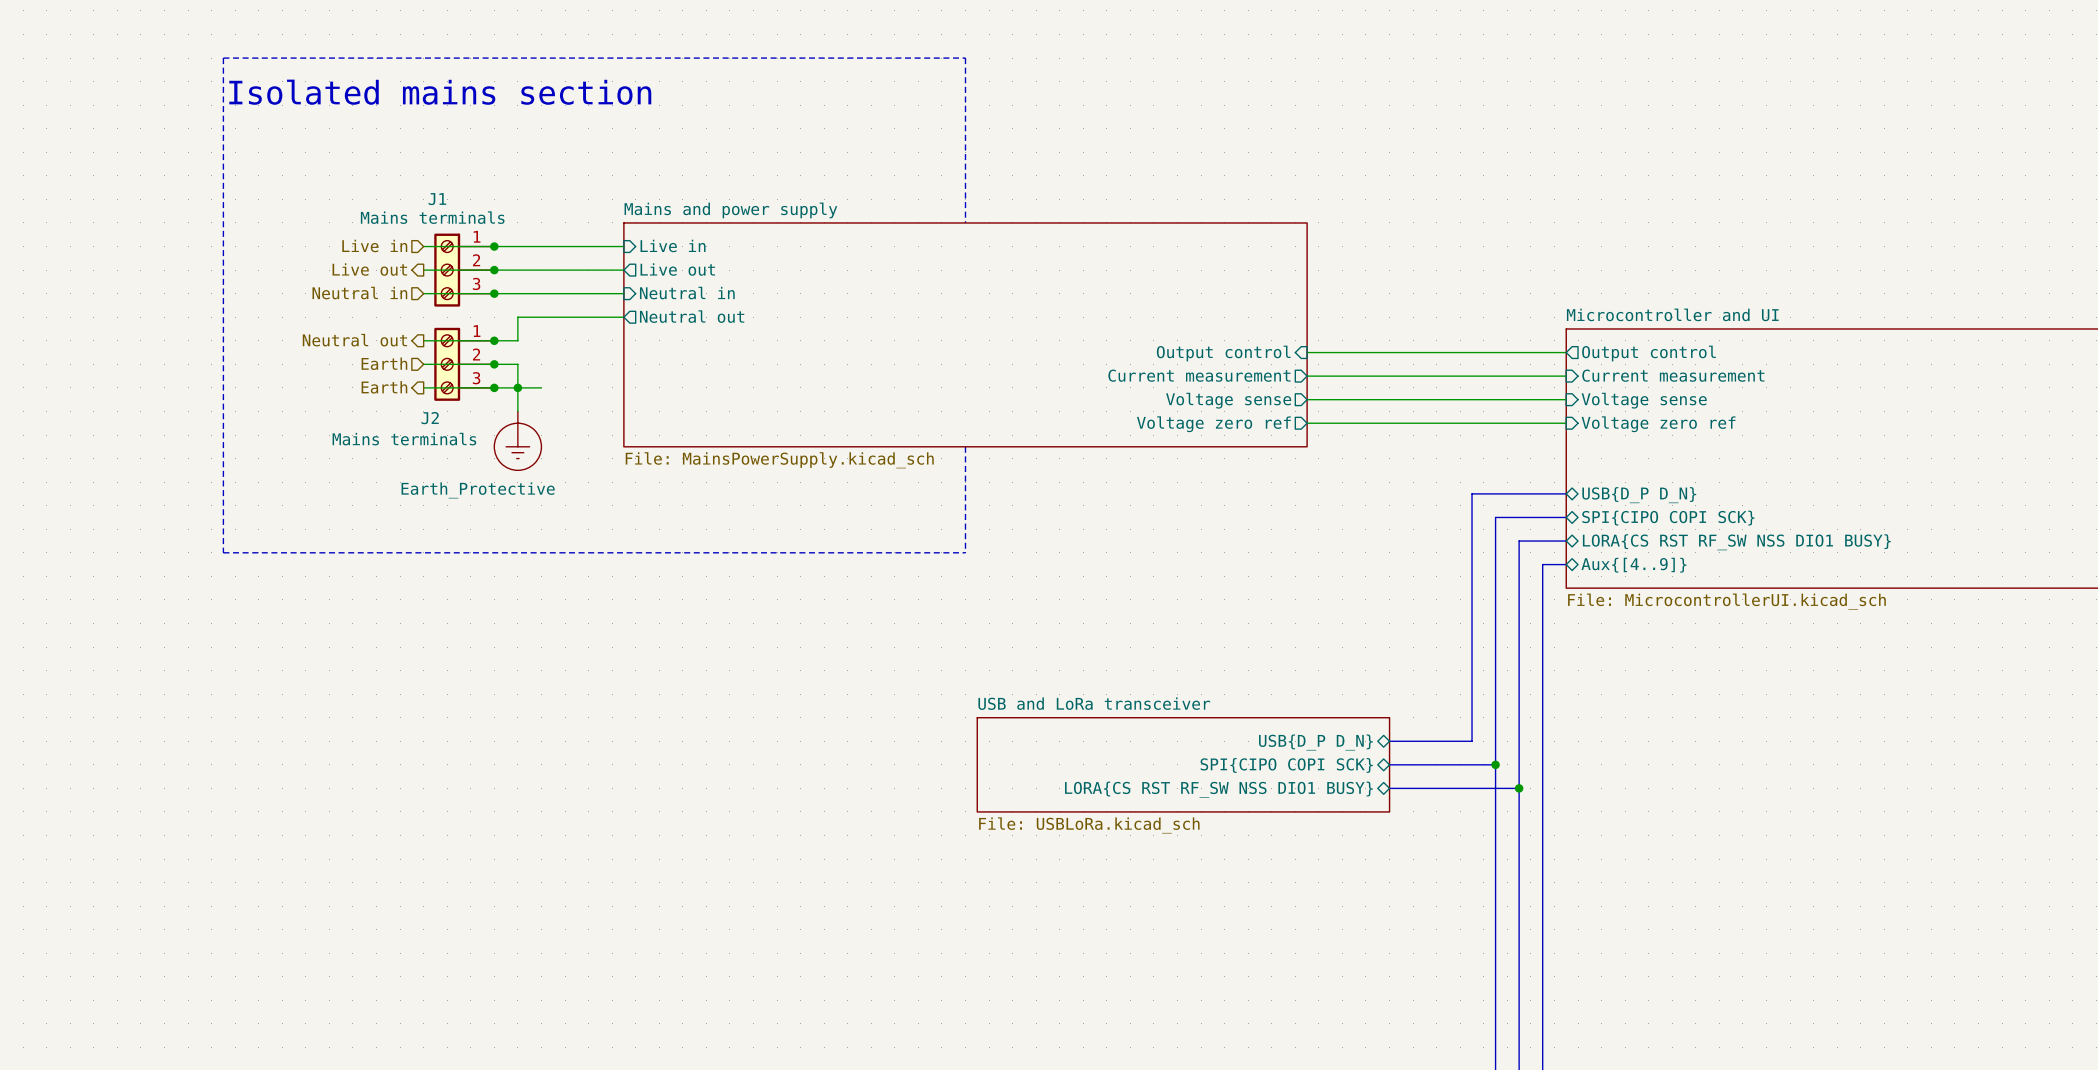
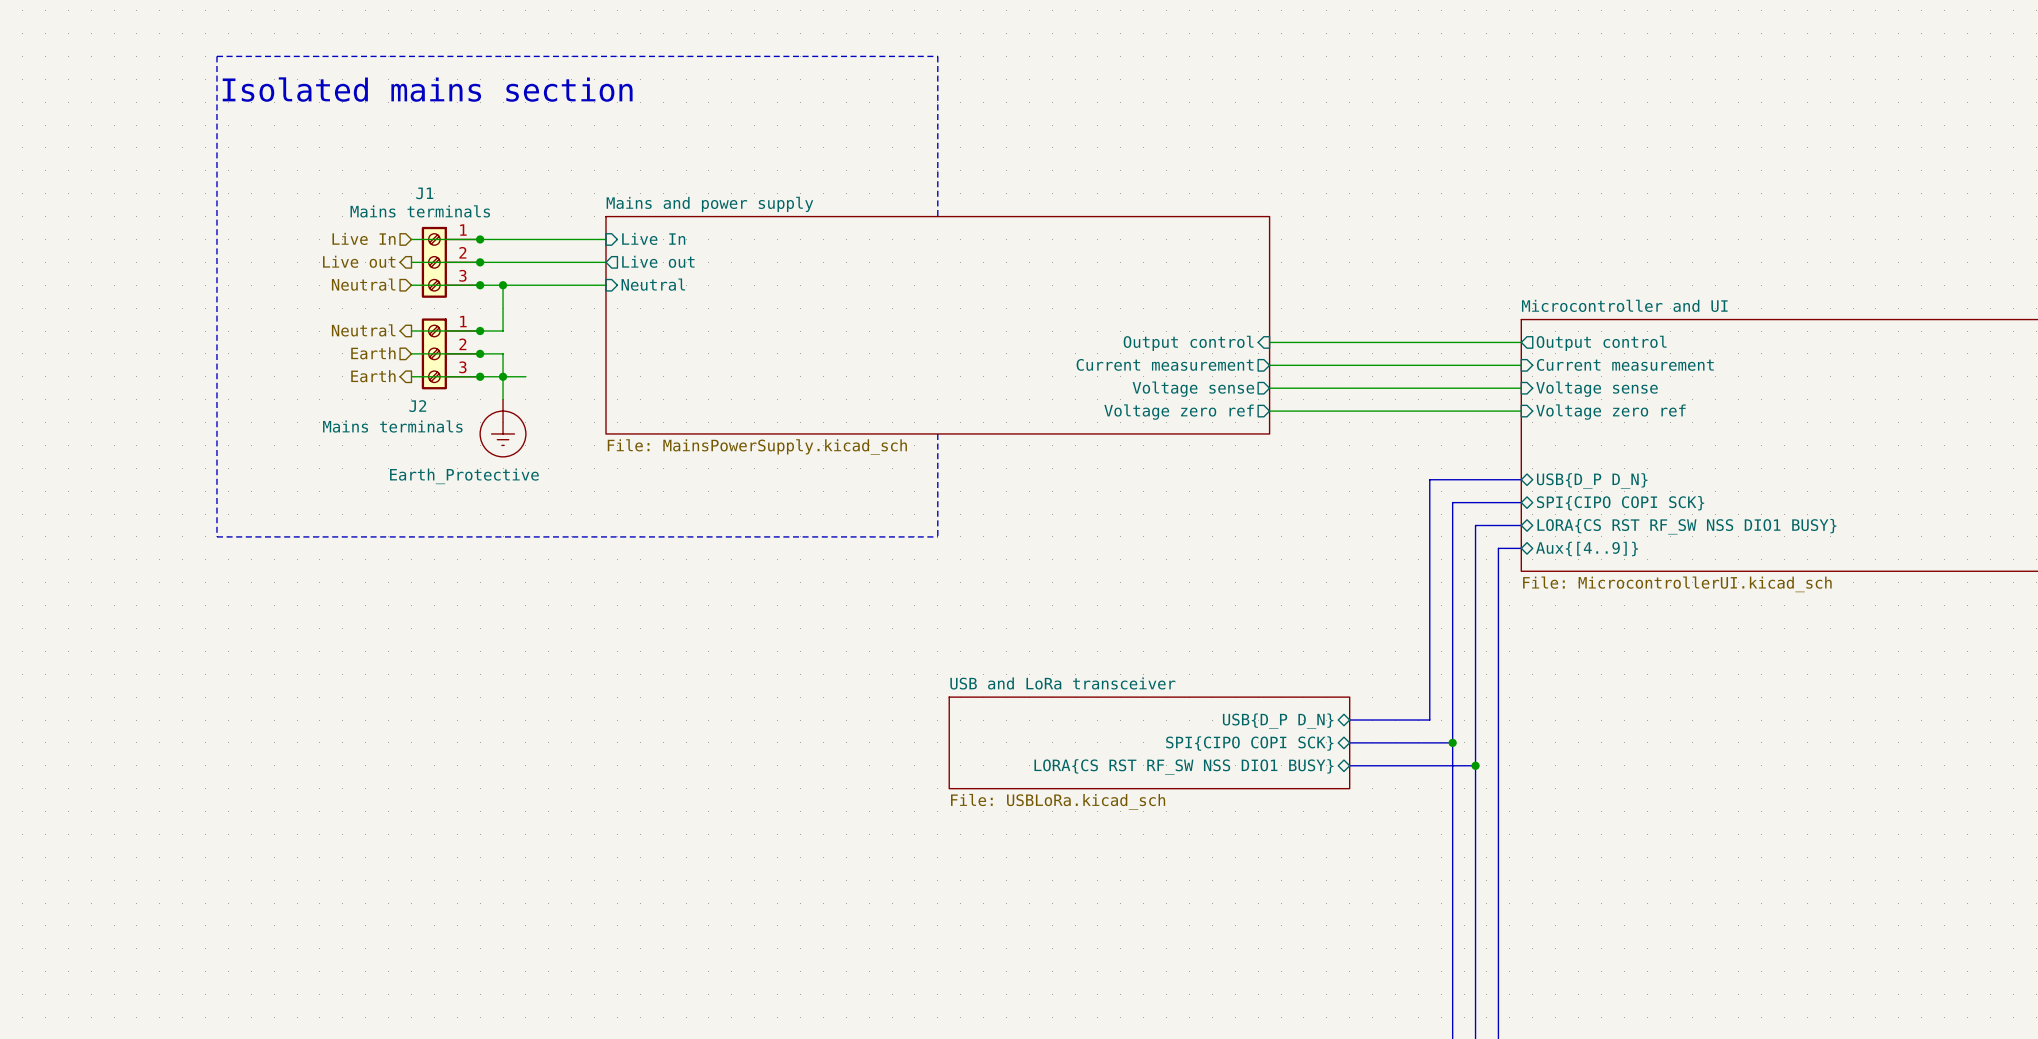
hierarchical label: Live in (374, 245) -> Live In (364, 238)
sheet pin: Live in (673, 245) -> Live In (653, 238)
hierarchical label: Neutral in (359, 293) -> Neutral (363, 284)
junction: none -> (503, 285)
sheet pin: Neutral in (687, 293) -> Neutral (653, 284)
sheet pin: Neutral out (692, 316) -> none
wire: (517, 317) (623, 317) -> (503, 308) (503, 285)
hierarchical label: Neutral out (354, 340) -> Neutral (363, 330)

